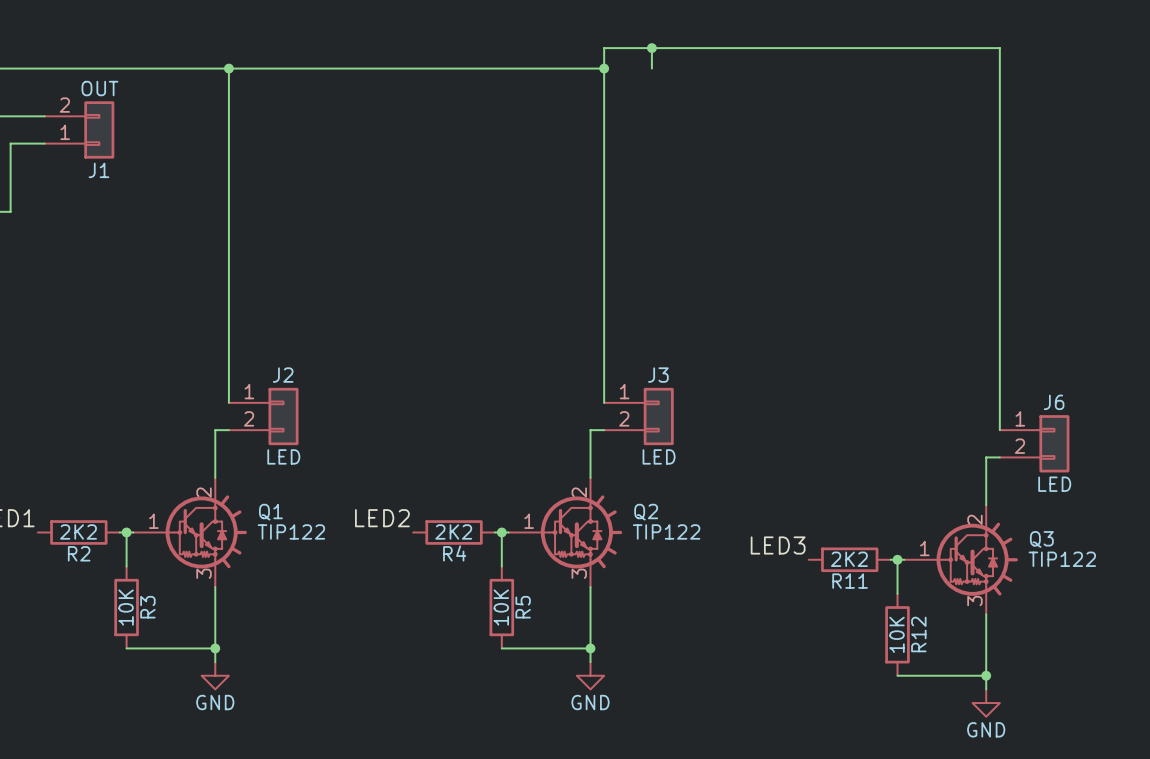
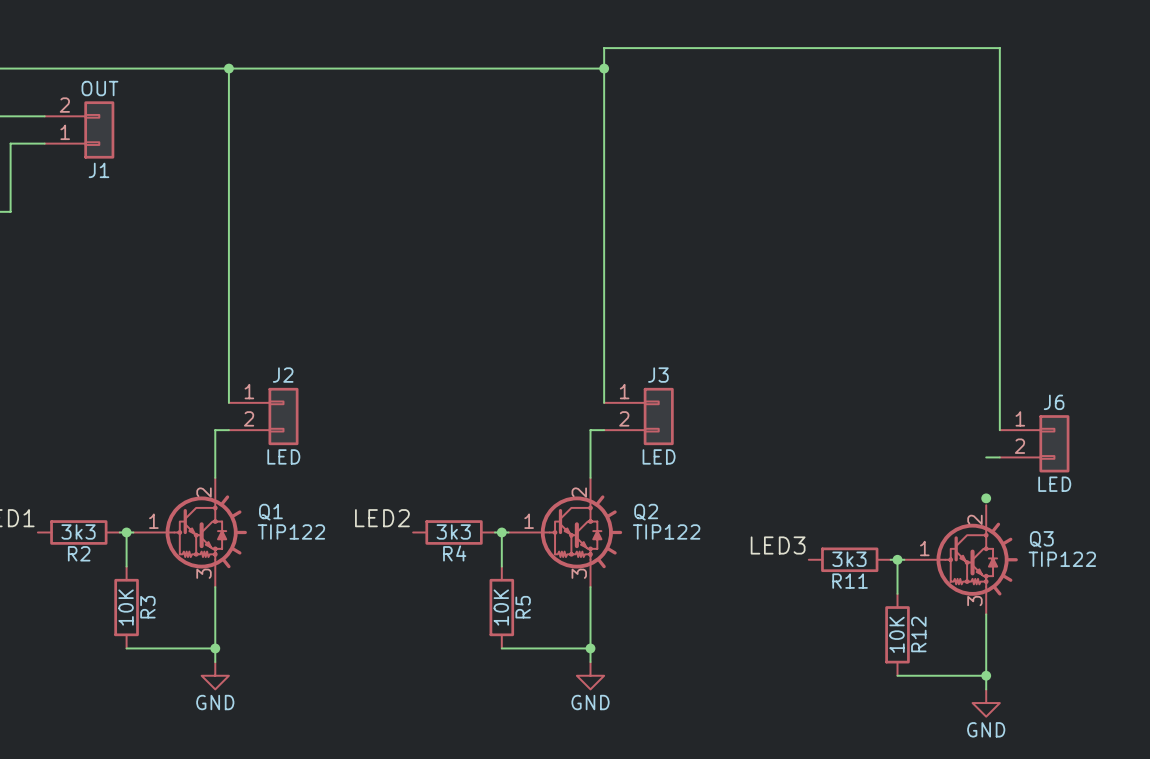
wire: (651, 48) (651, 68) -> none
junction: (651, 48) -> none
wire: (986, 457) (986, 505) -> none
junction: none -> (986, 498)
R2 value: 2K2 (78, 531) -> 3k3 (78, 531)
R4 value: 2K2 (453, 531) -> 3k3 (453, 531)
R11 value: 2K2 (849, 559) -> 3k3 (849, 559)

